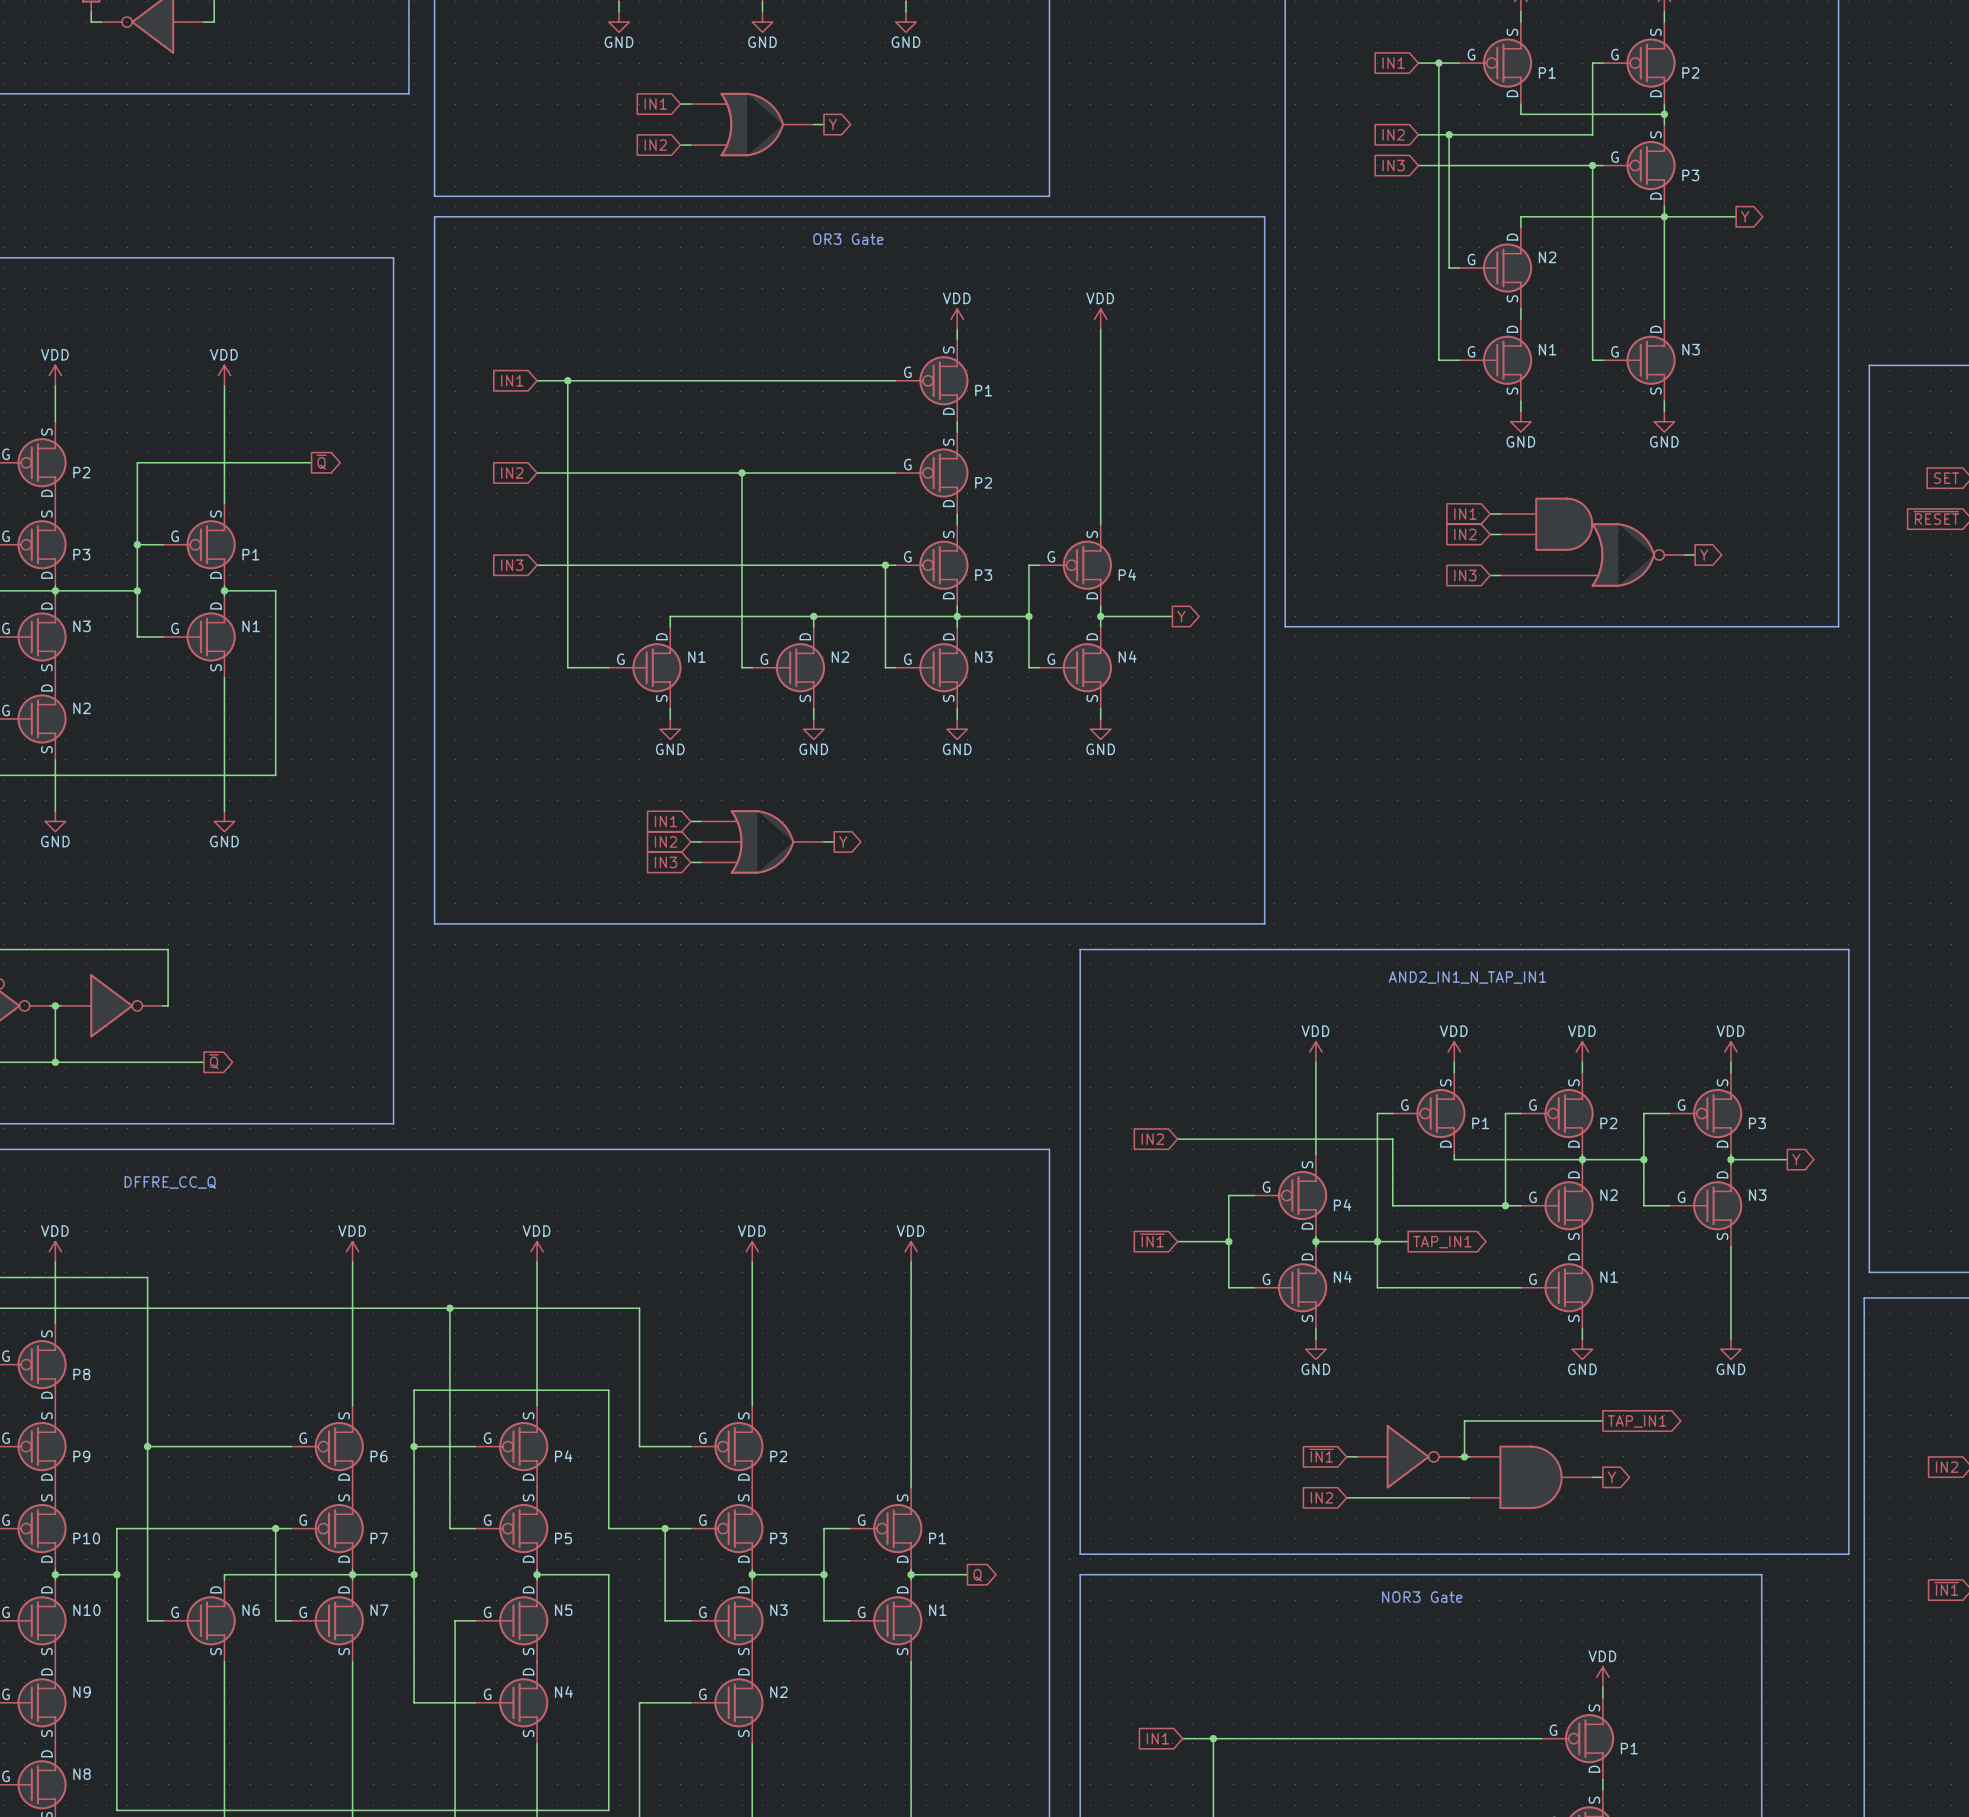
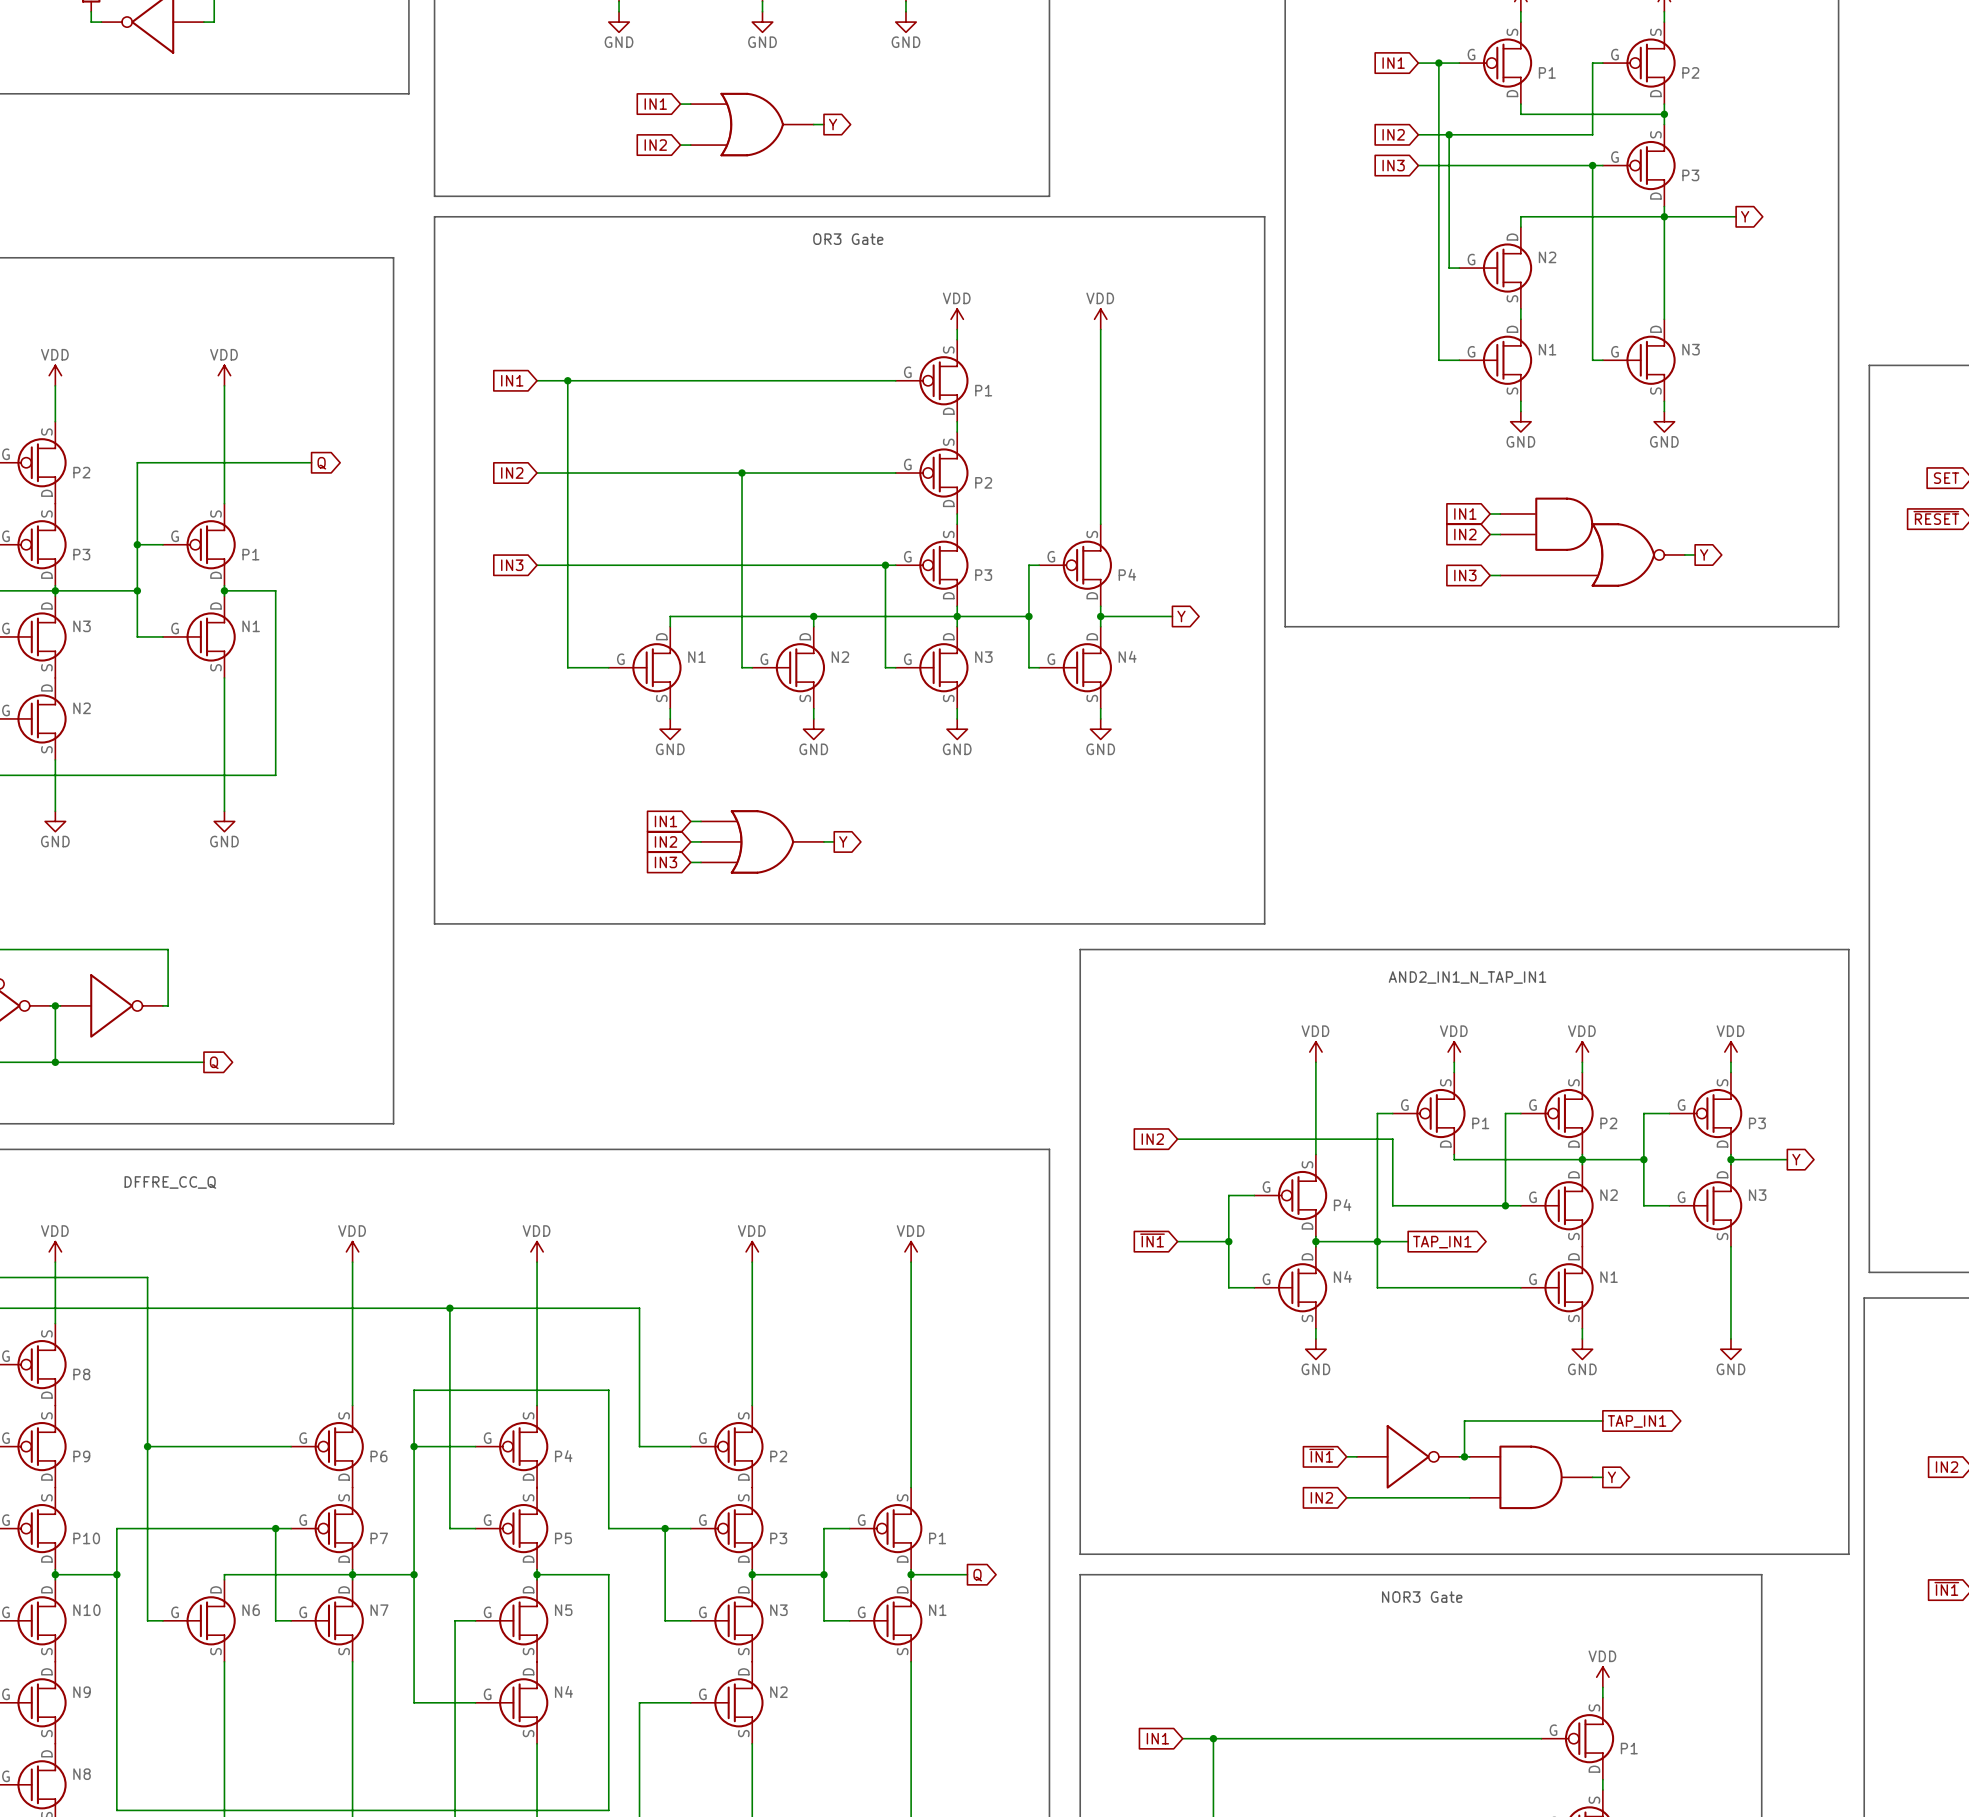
global label: ~{Q} (321, 462) -> Q (321, 463)
global label: ~{Q} (213, 1061) -> Q (214, 1062)

